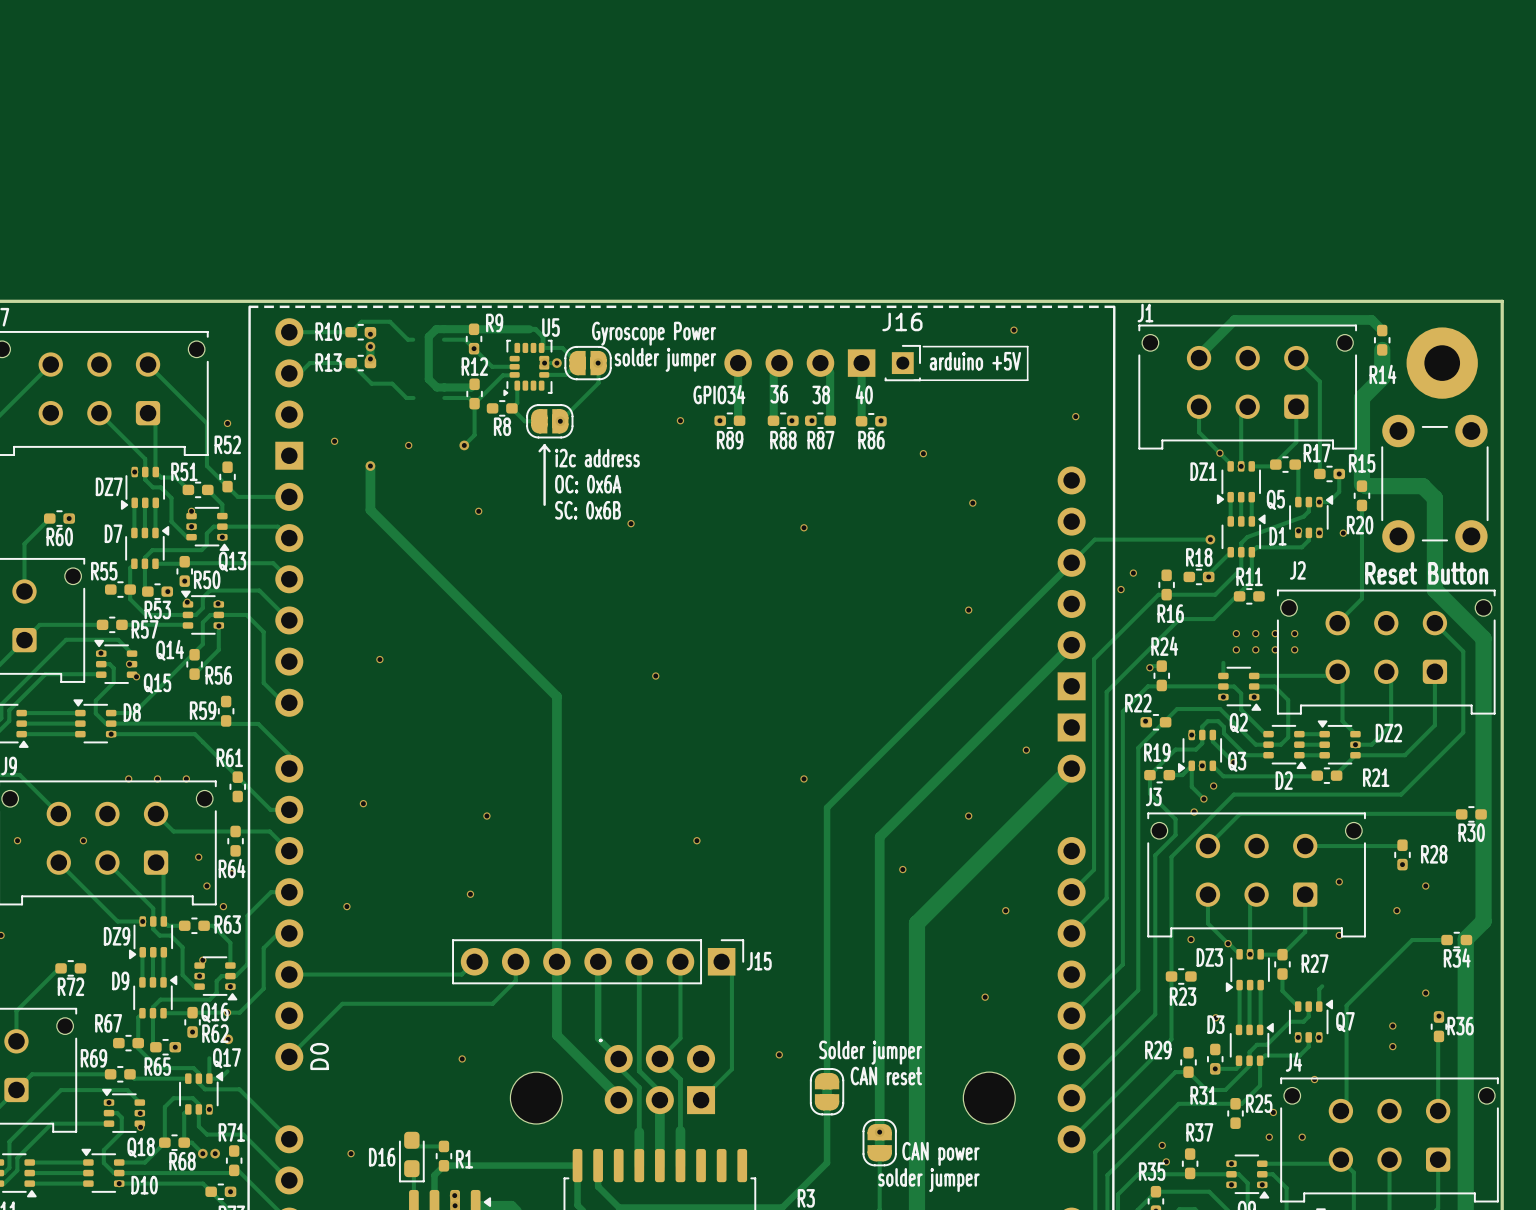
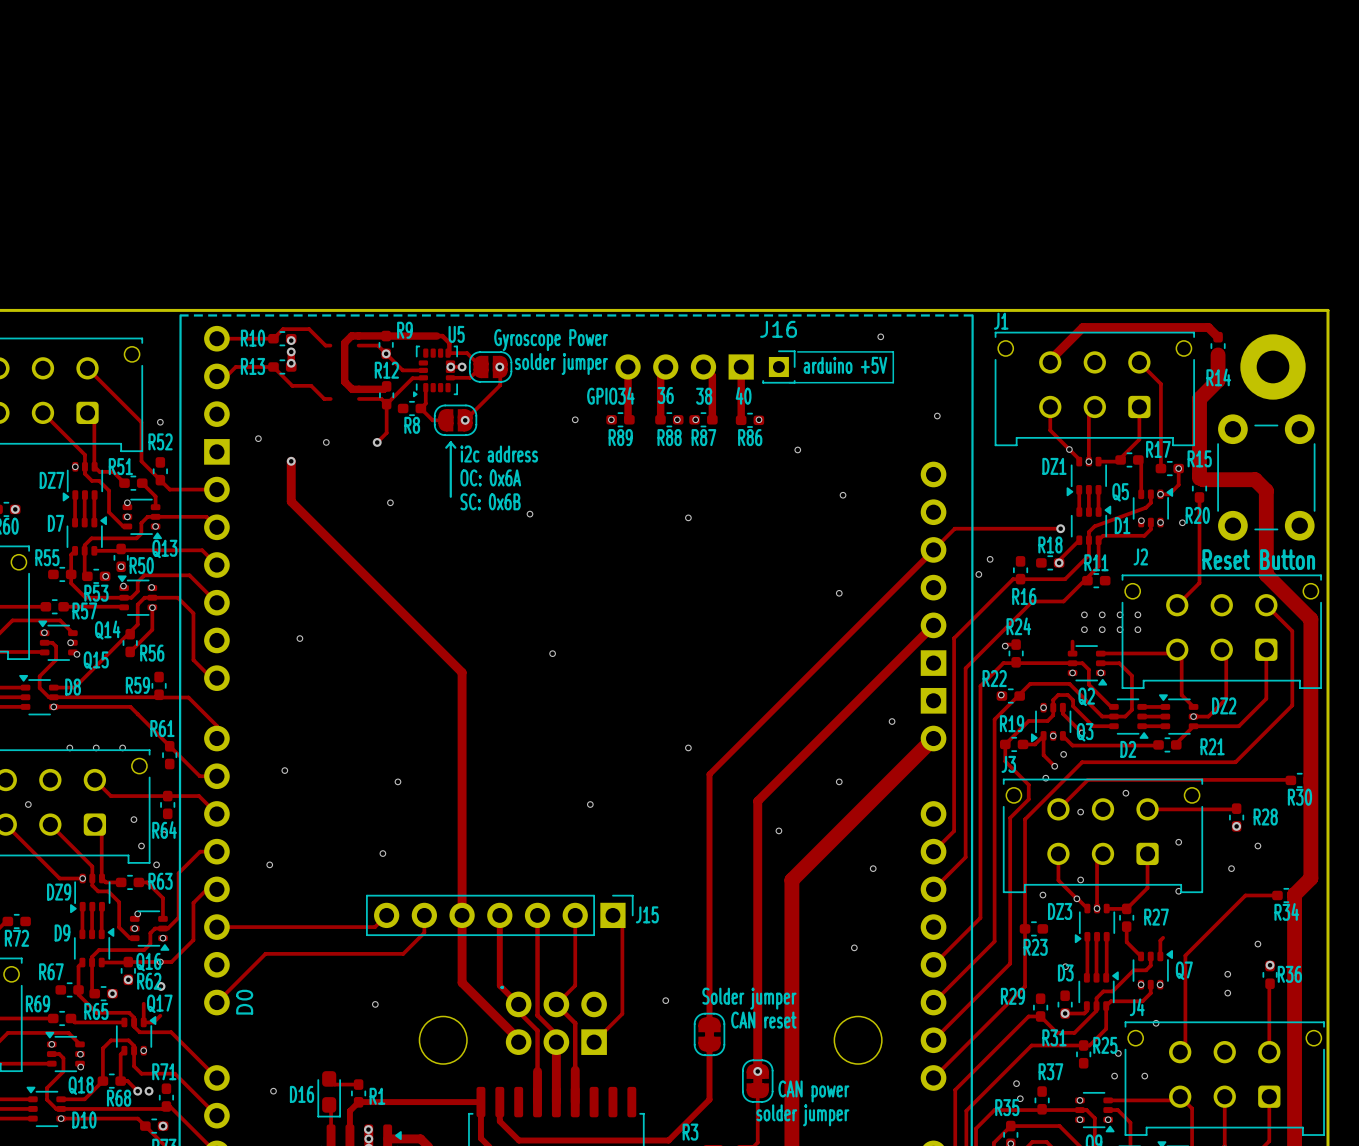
via: none -> (1125, 793)
via: none -> (1080, 812)
via: none -> (1080, 879)

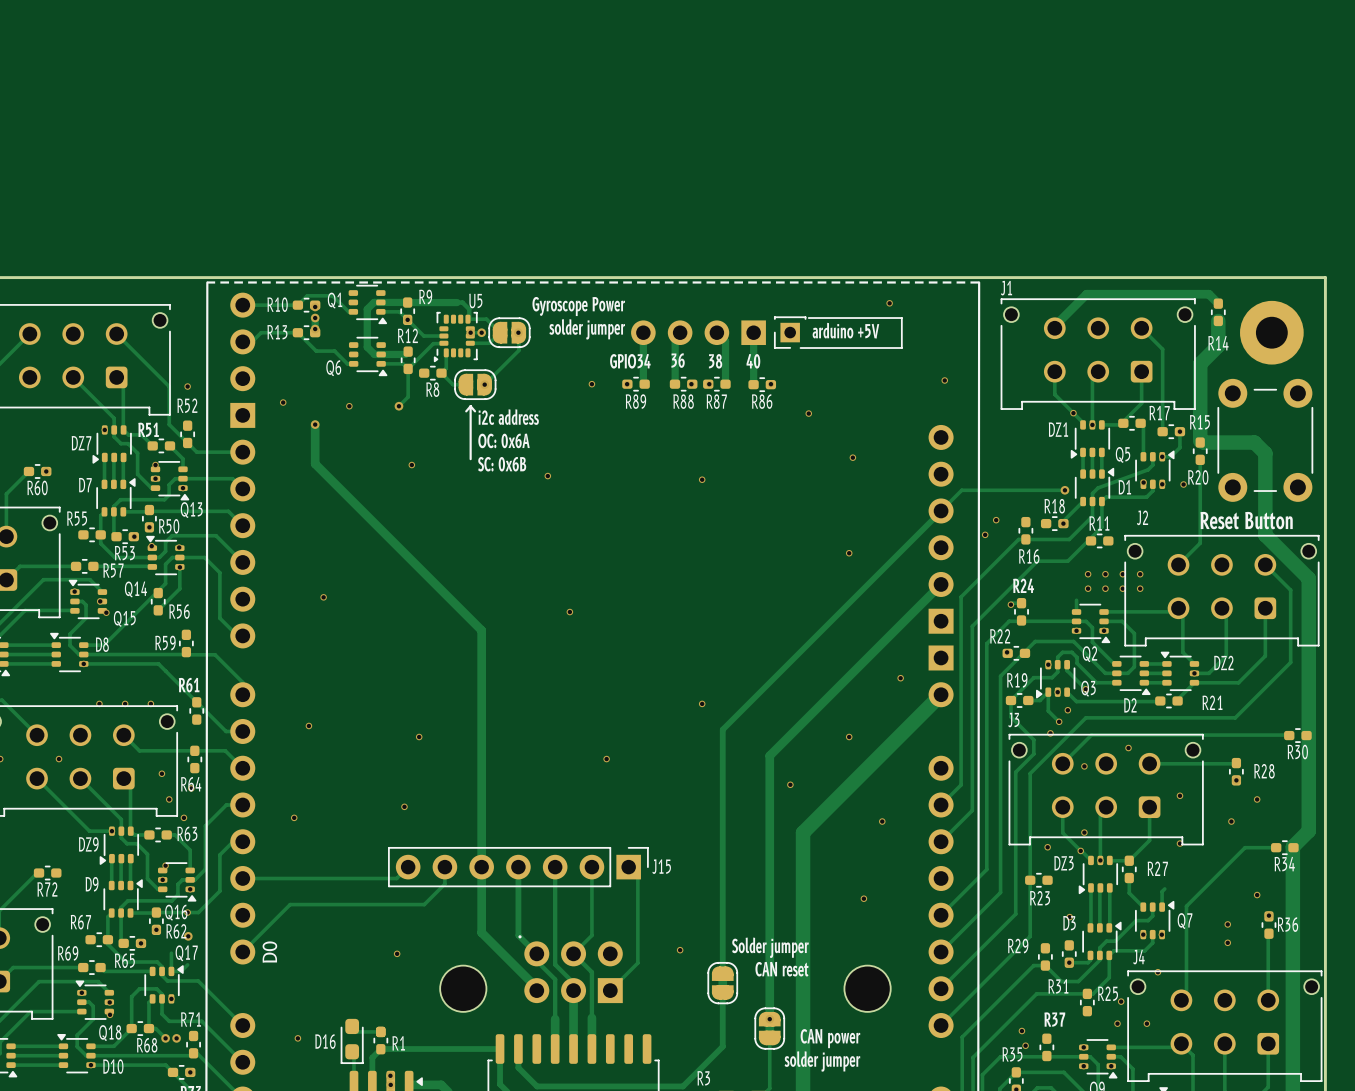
Q1: none -> (367, 304)
part: none -> (790, 332)
J16: (778, 367) -> none
Q6: none -> (368, 356)
part: none -> (380, 1031)

